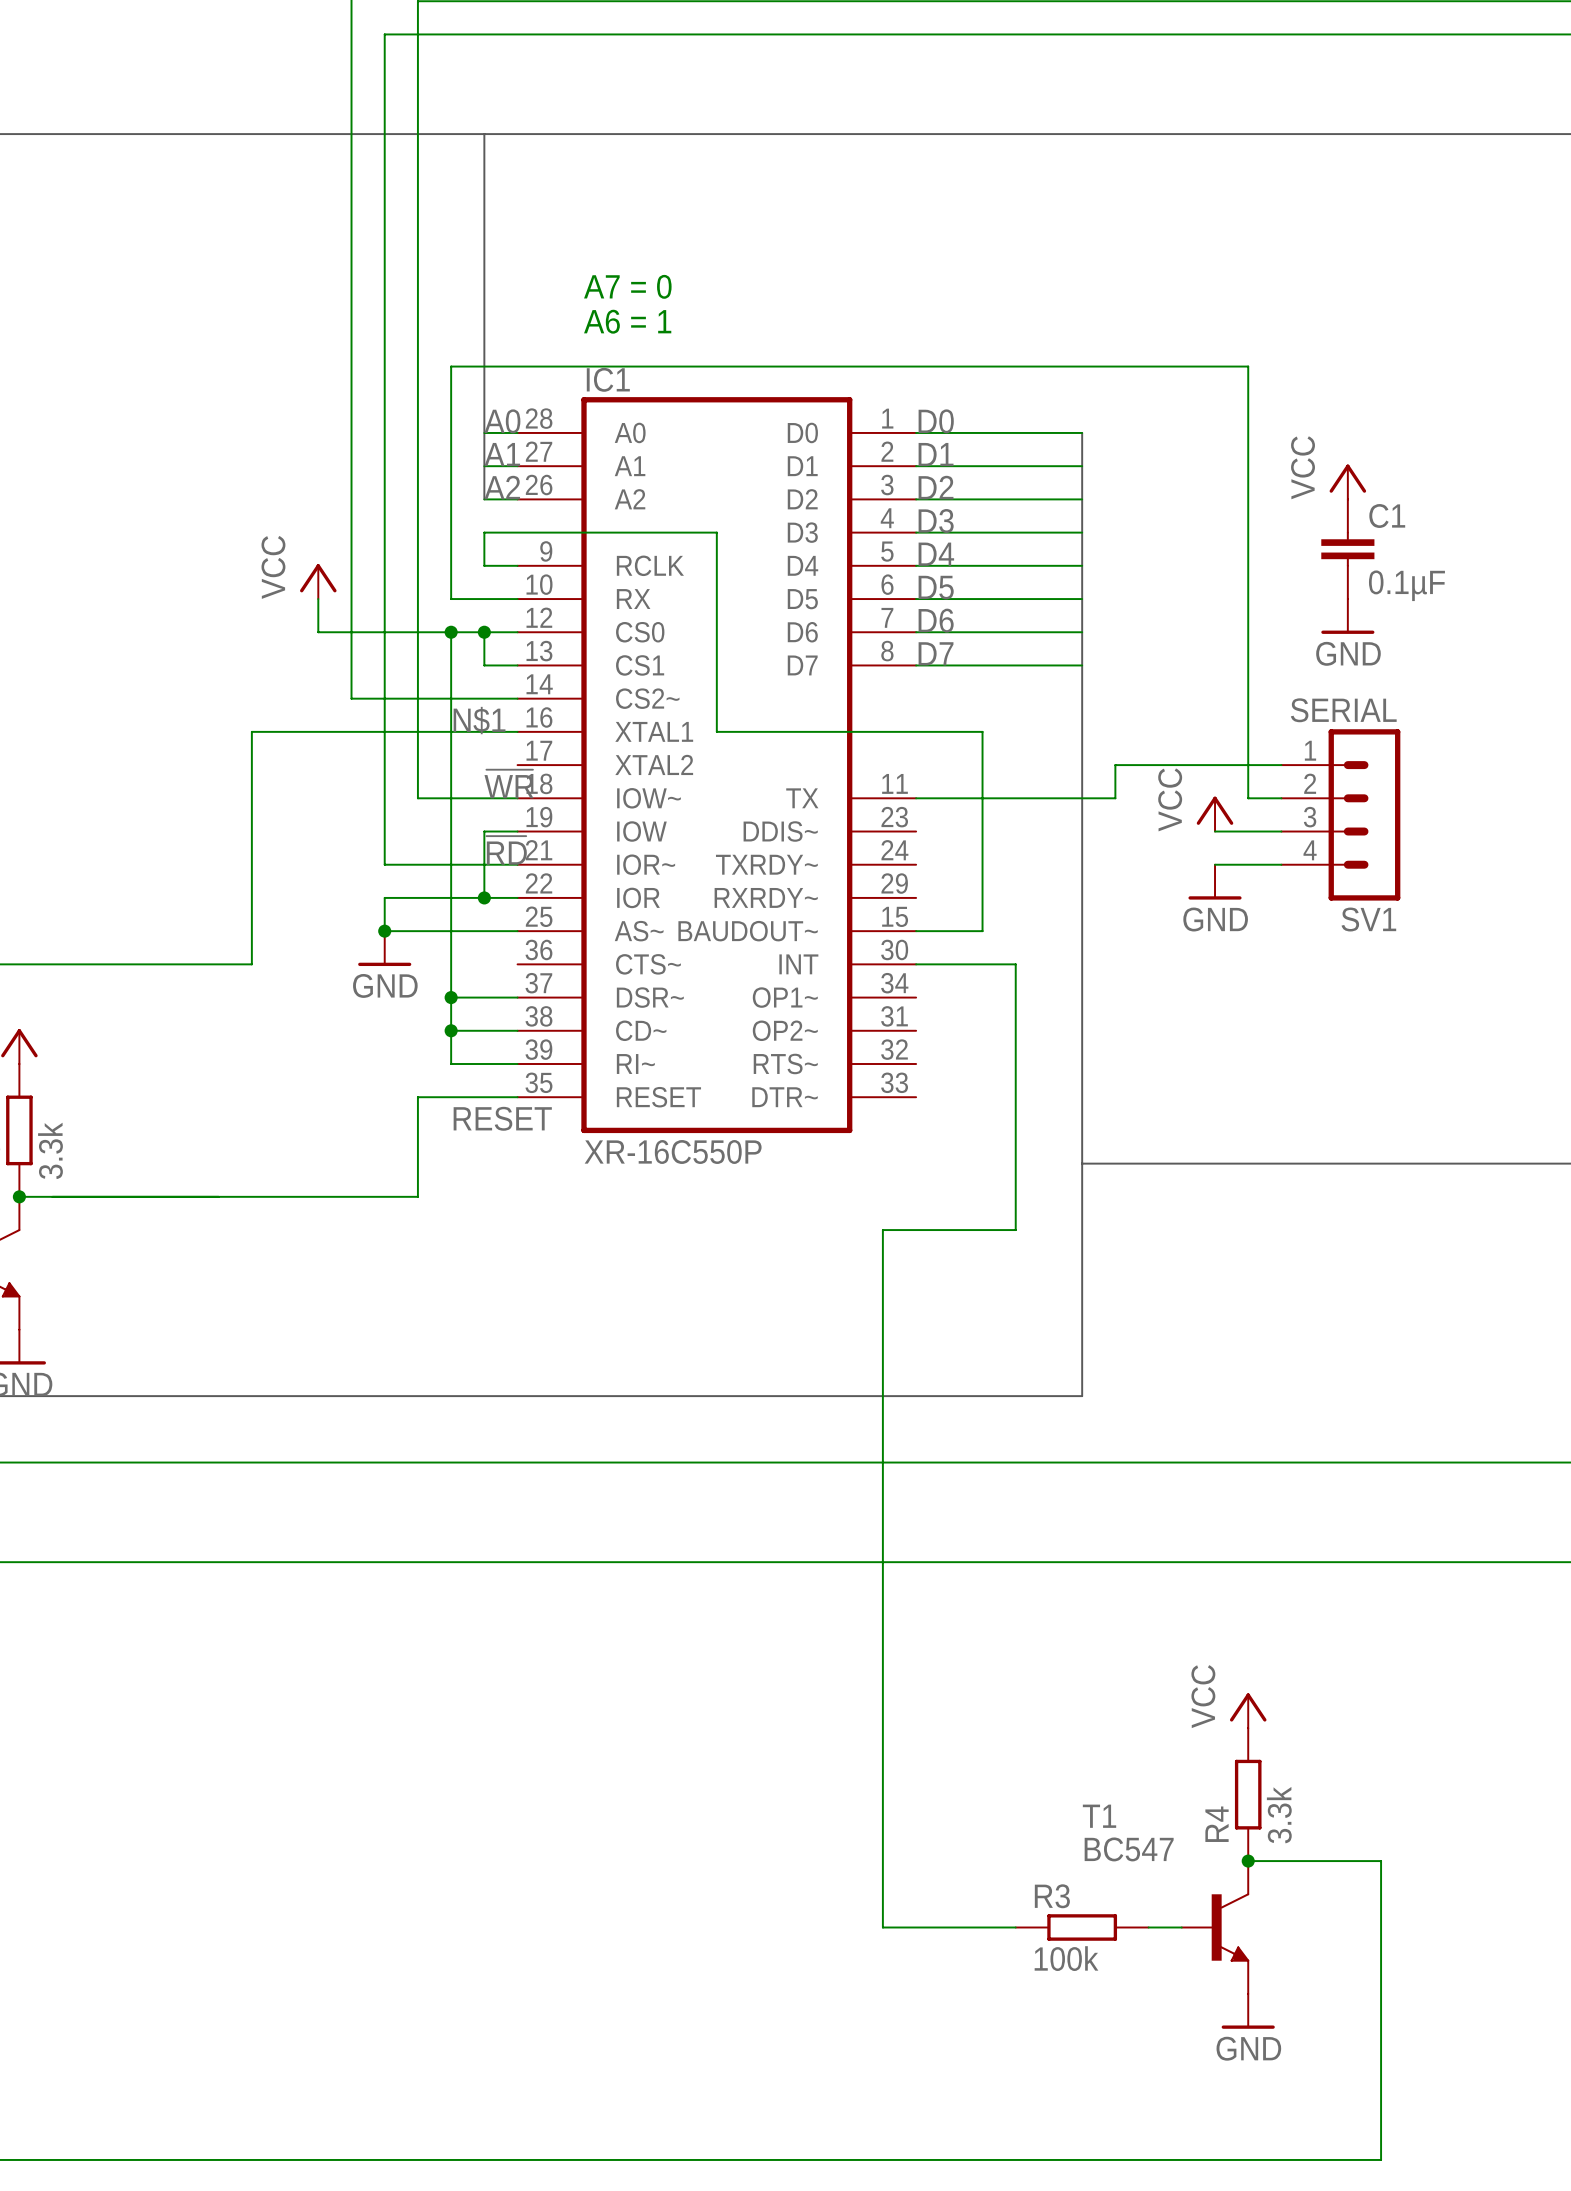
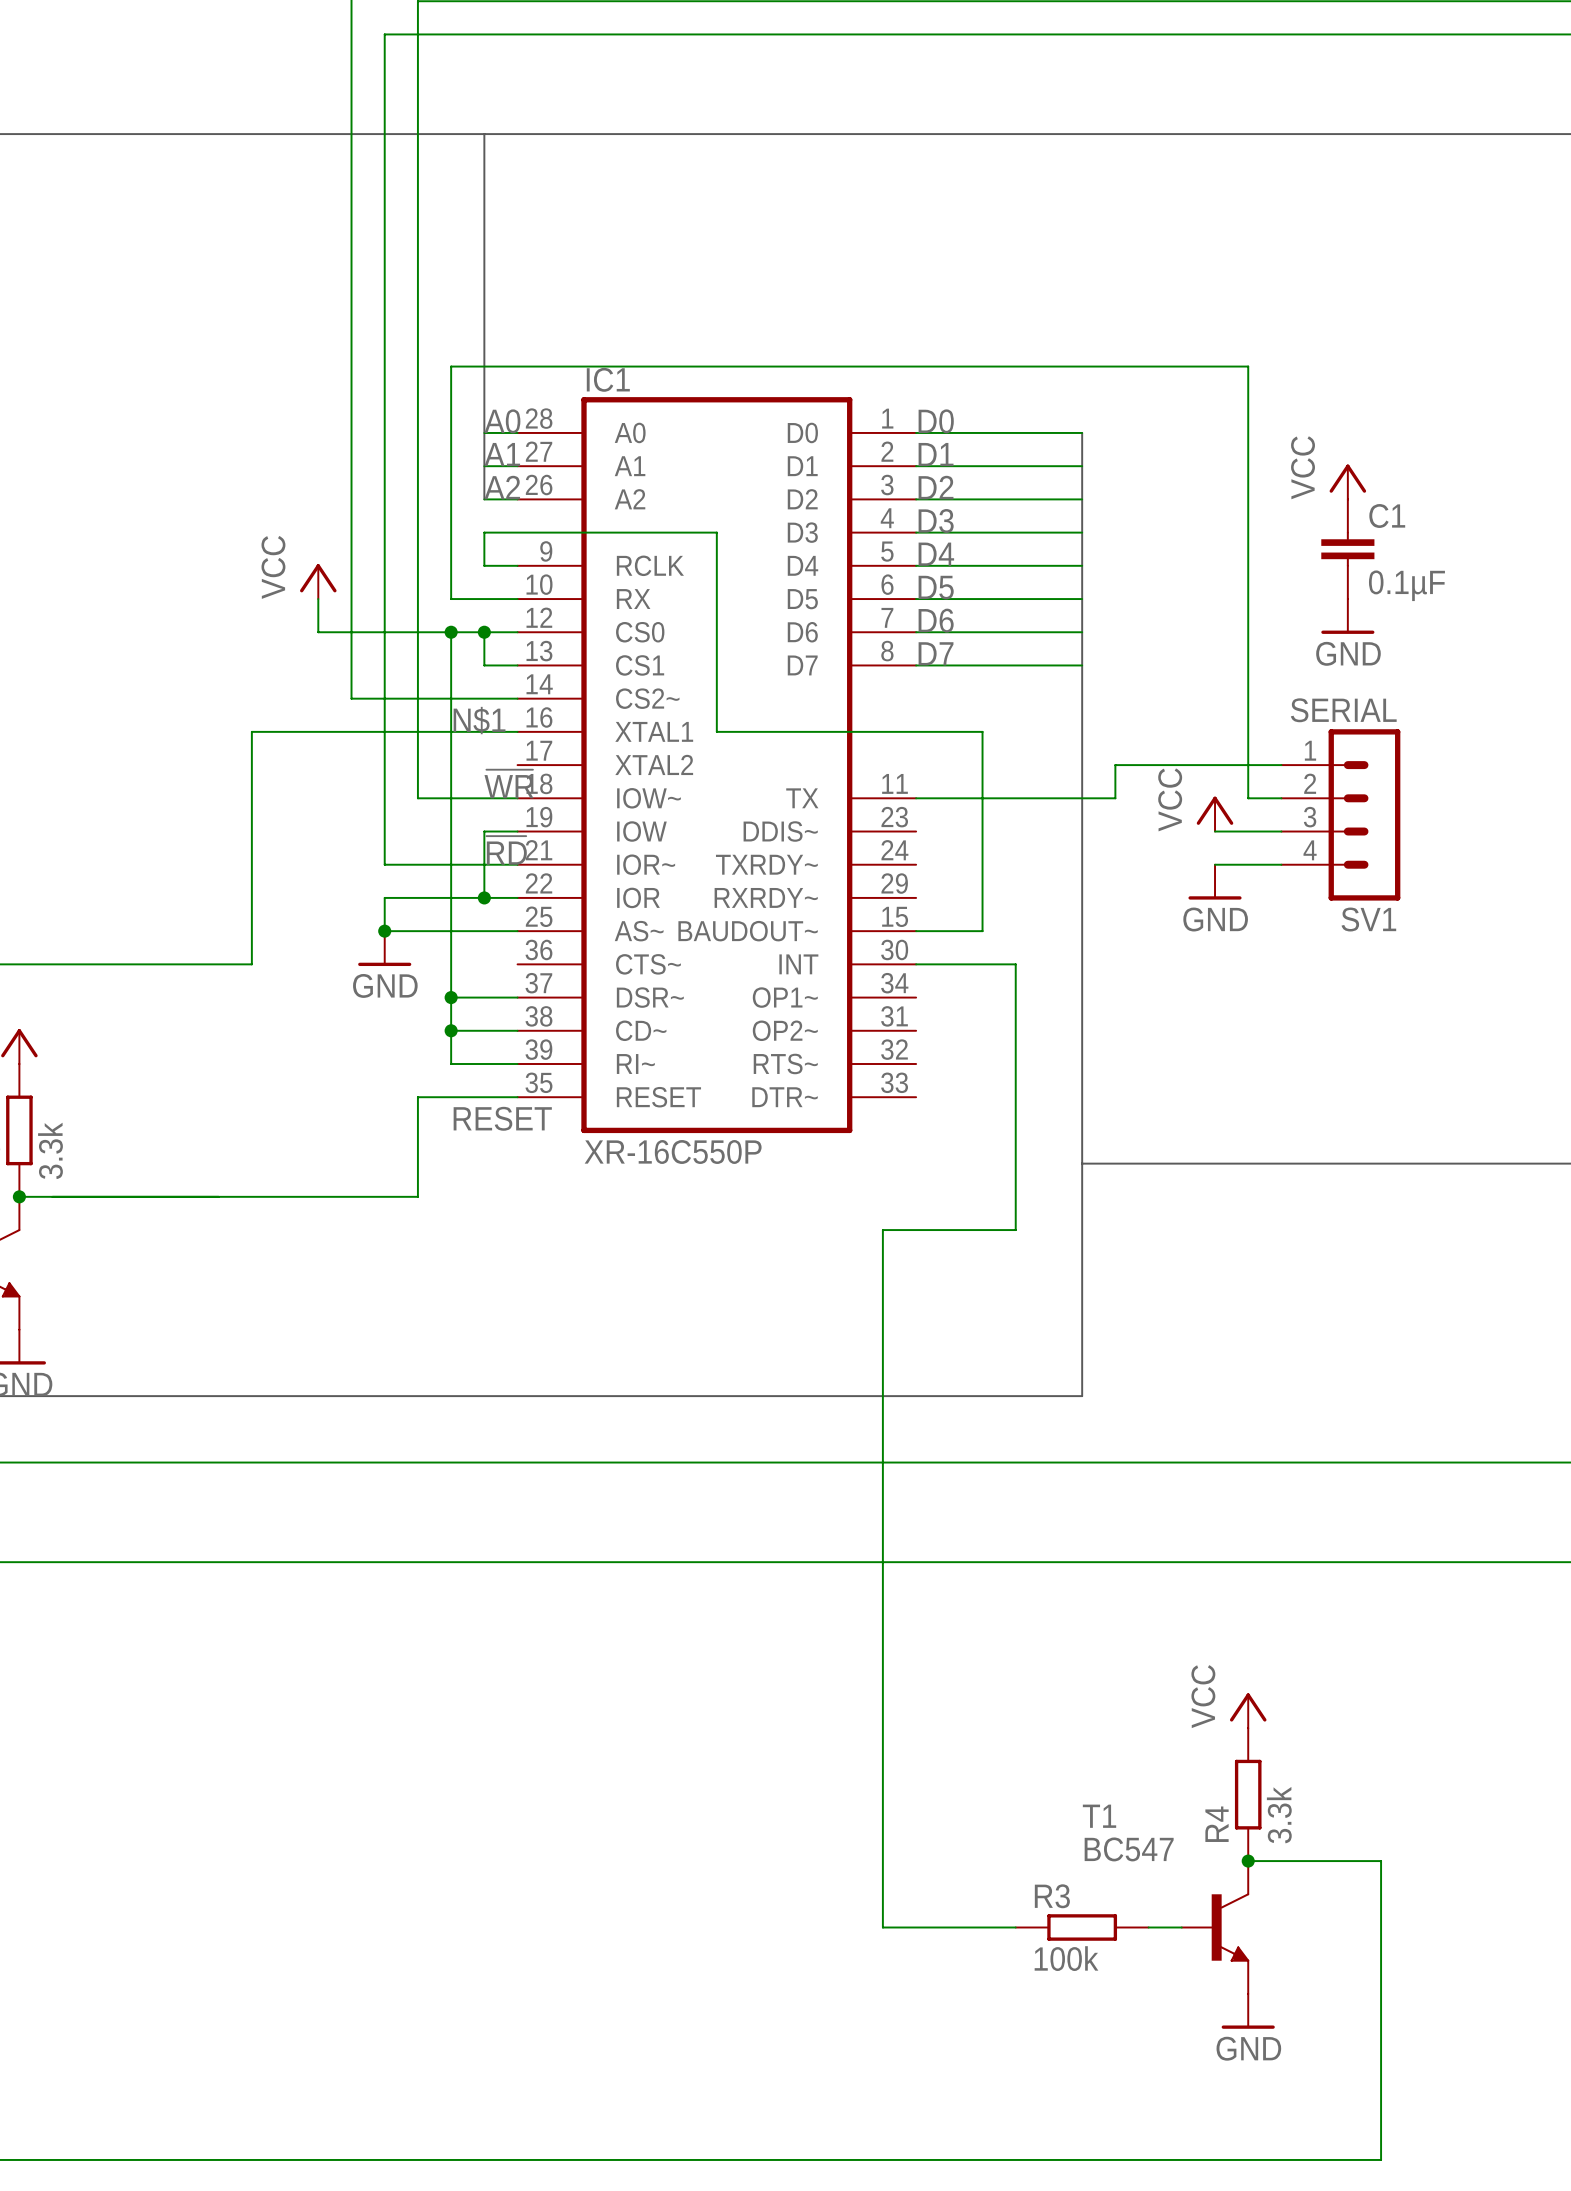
text: A7 = 0 (627, 286) -> none
text: A6 = 1 (627, 321) -> none

